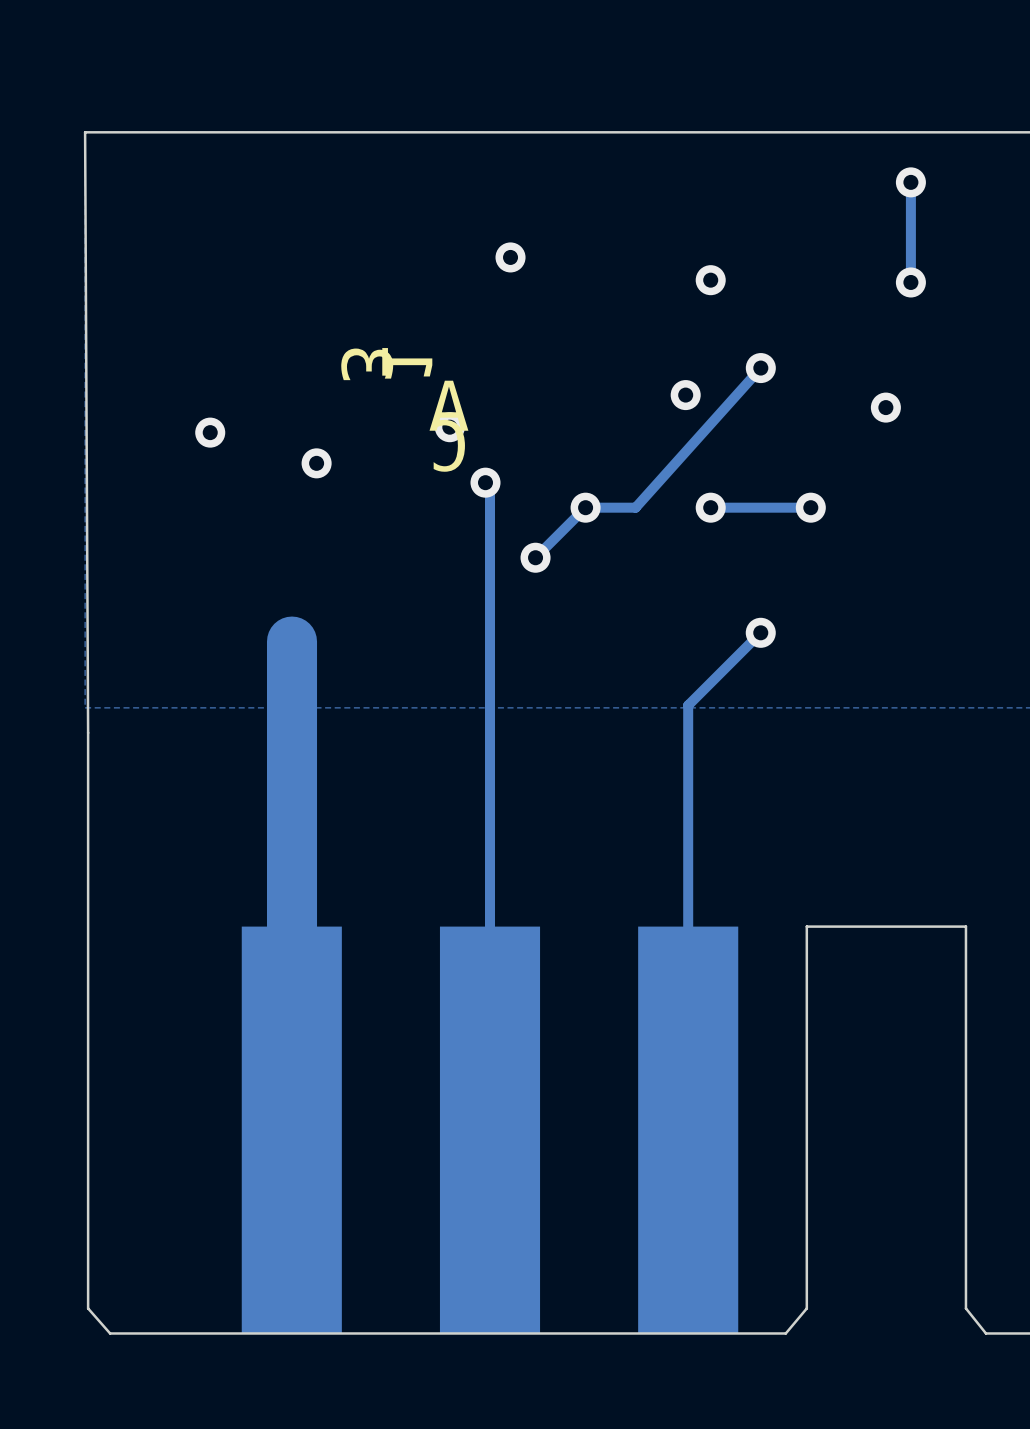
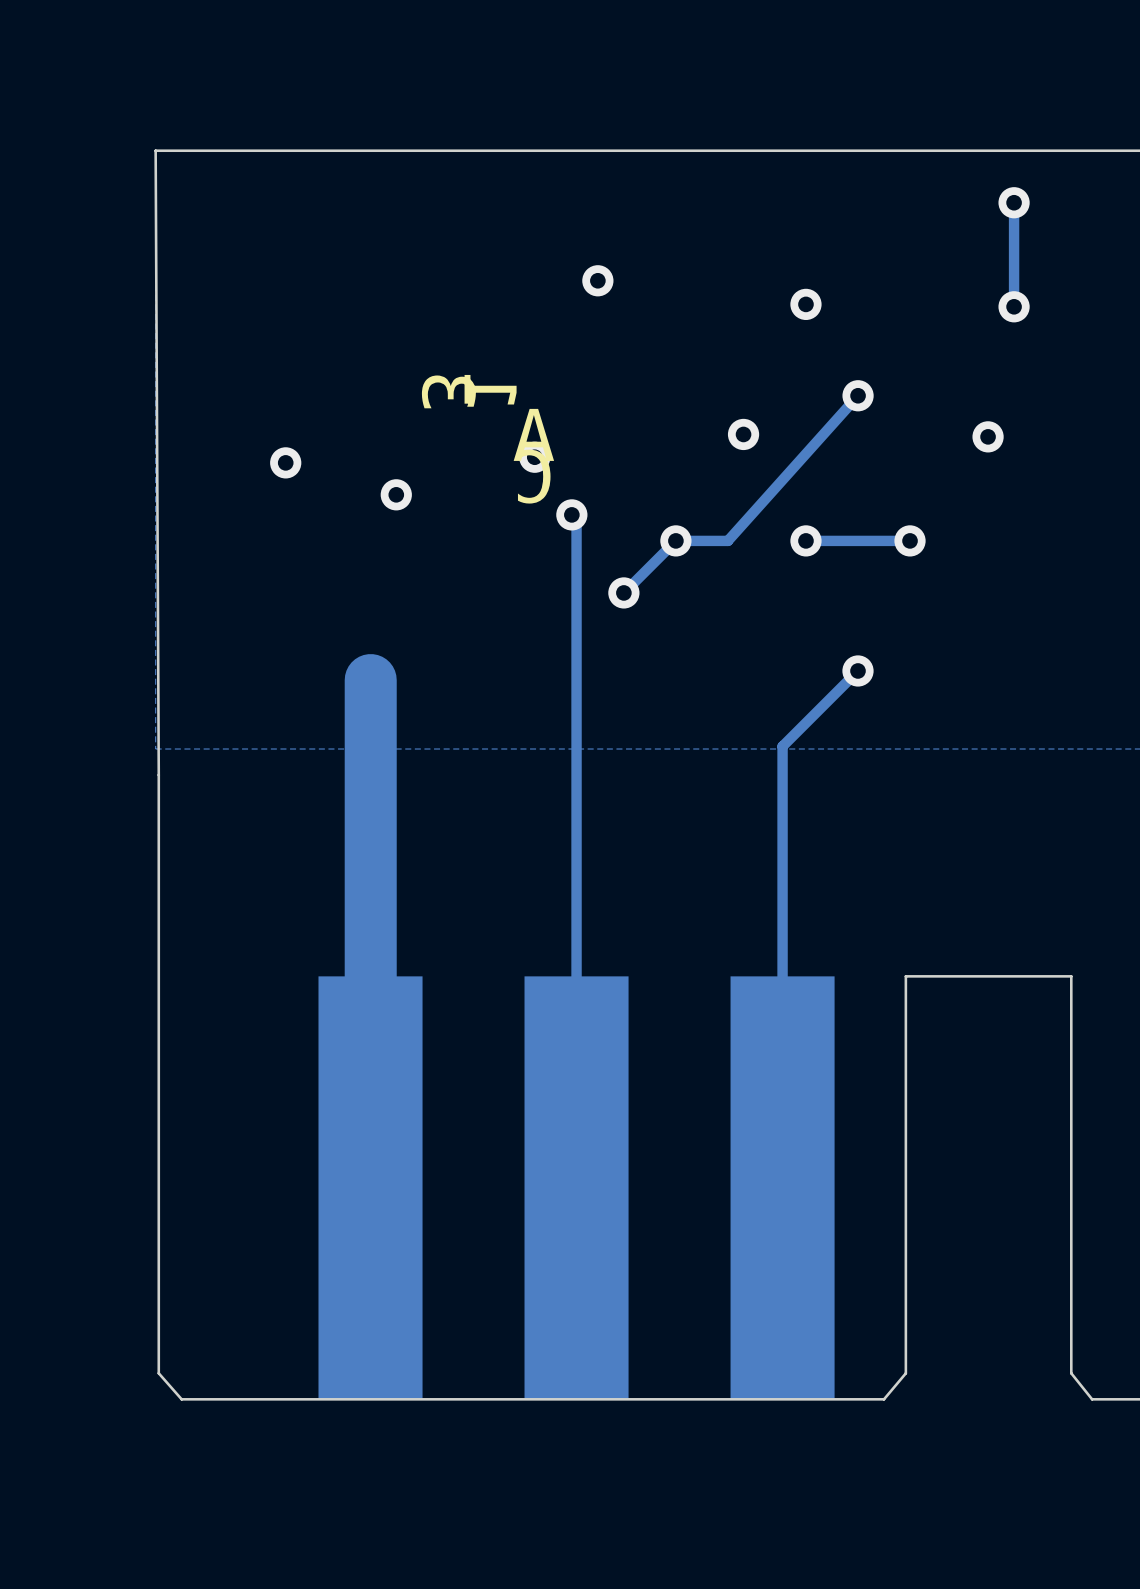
via position: (685, 395) -> (743, 434)

